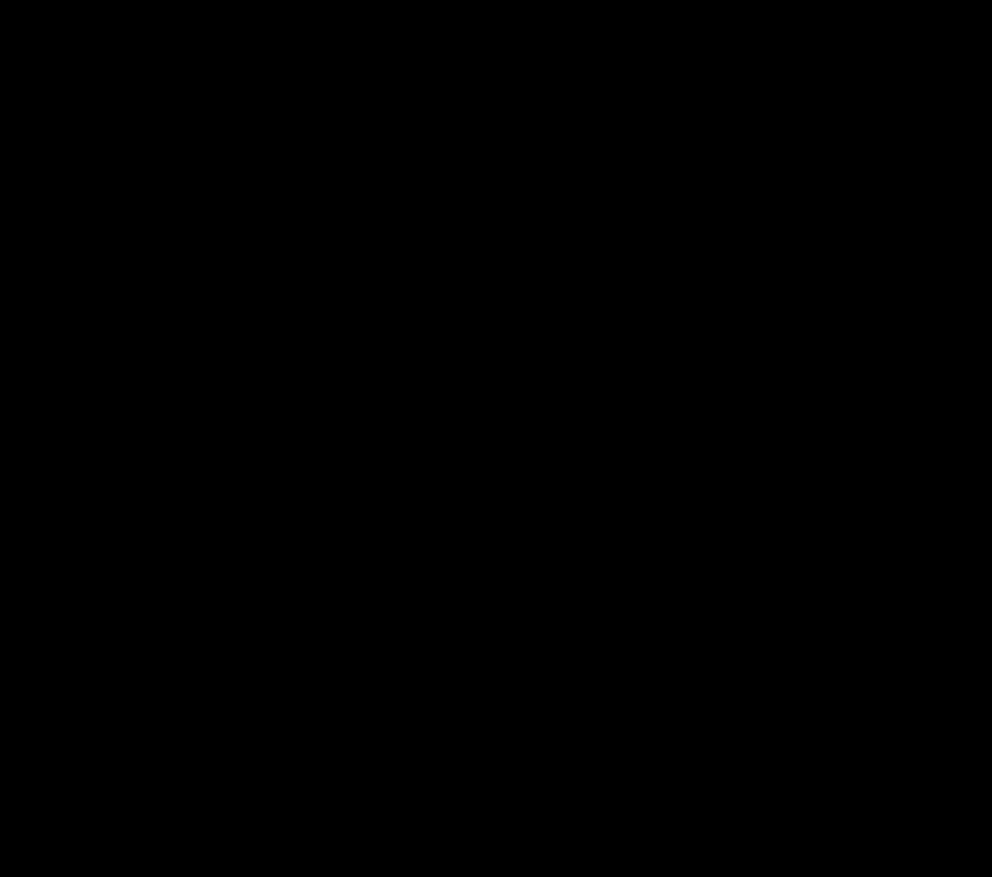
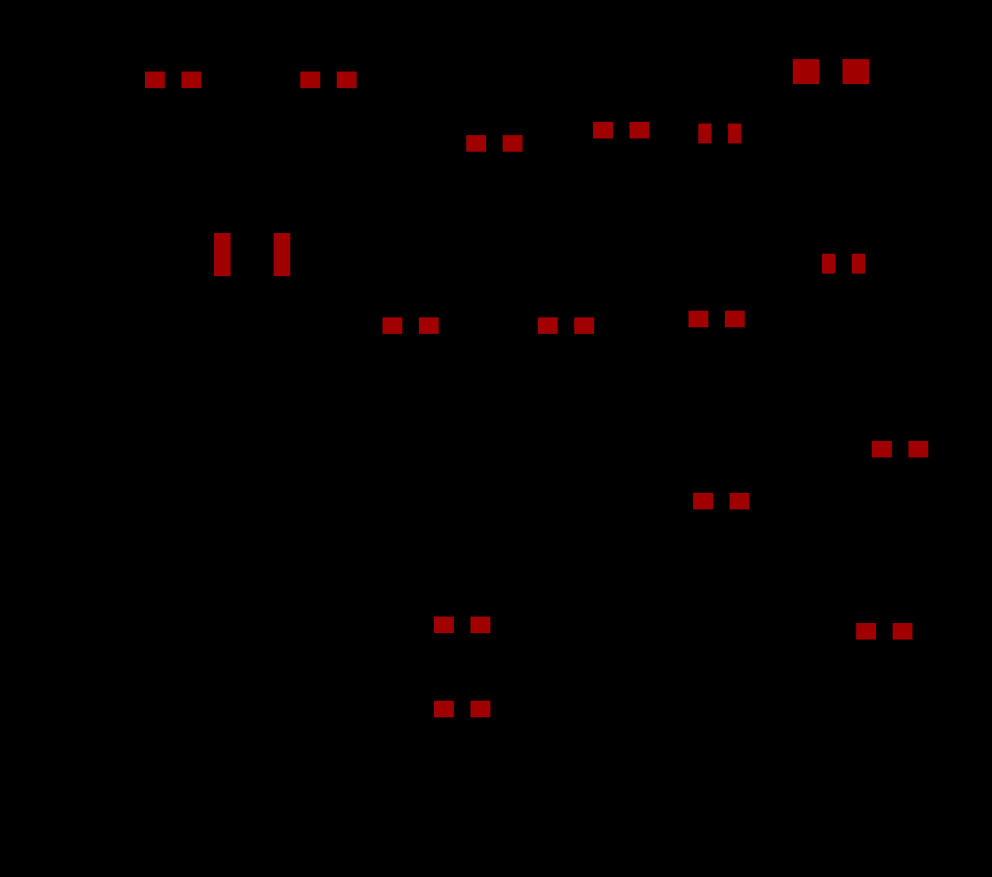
part: none -> (830, 71)
part: none -> (173, 79)
part: none -> (328, 79)
part: none -> (621, 130)
part: none -> (719, 133)
part: none -> (494, 143)
part: none -> (252, 254)
part: none -> (843, 263)
part: none -> (716, 318)
part: none -> (410, 325)
part: none -> (565, 325)
part: none -> (900, 449)
part: none -> (721, 501)
part: none -> (462, 624)
part: none -> (884, 631)
part: none -> (462, 708)

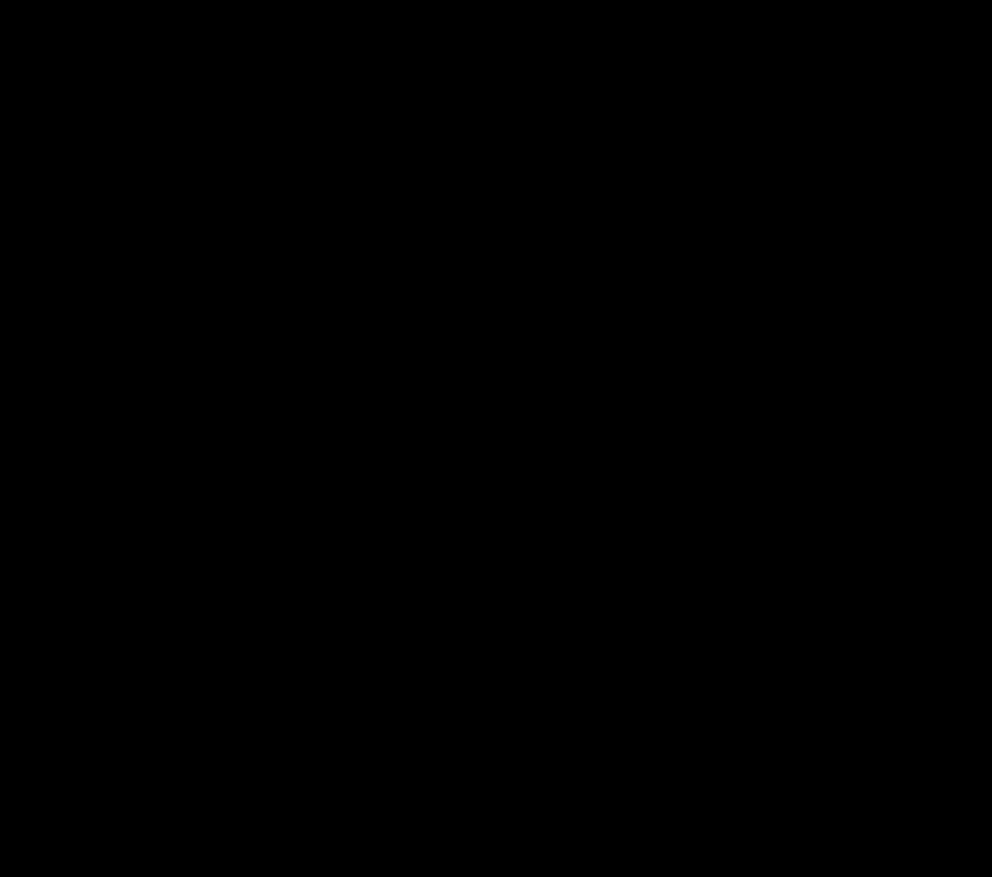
part: (830, 71) -> none
part: (173, 79) -> none
part: (328, 79) -> none
part: (621, 130) -> none
part: (719, 133) -> none
part: (494, 143) -> none
part: (252, 254) -> none
part: (843, 263) -> none
part: (716, 318) -> none
part: (410, 325) -> none
part: (565, 325) -> none
part: (900, 449) -> none
part: (721, 501) -> none
part: (462, 624) -> none
part: (884, 631) -> none
part: (462, 708) -> none

